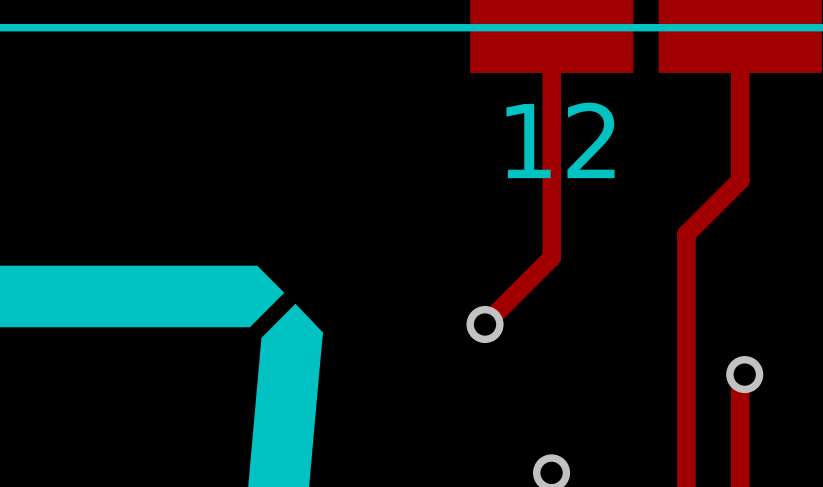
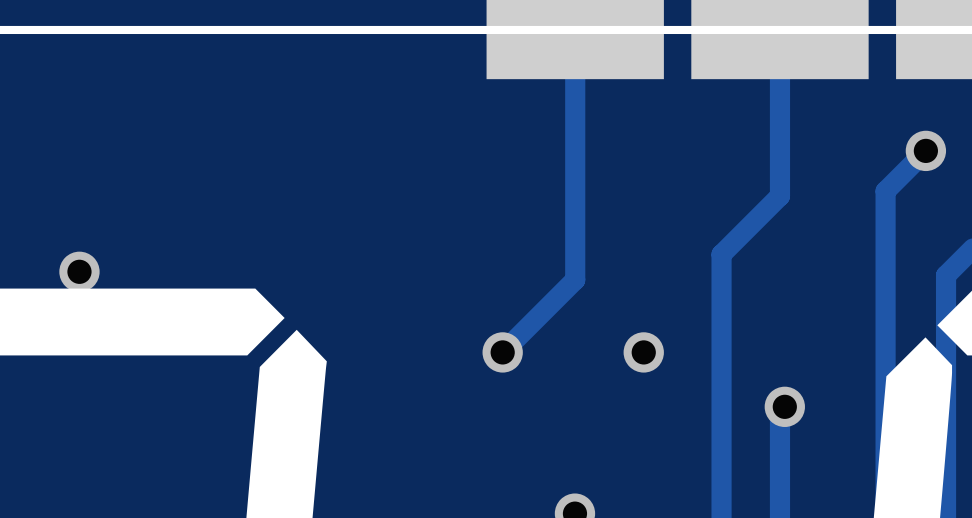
part text: 12 (560, 140) -> none
via: none -> (79, 271)
via: none -> (643, 352)

